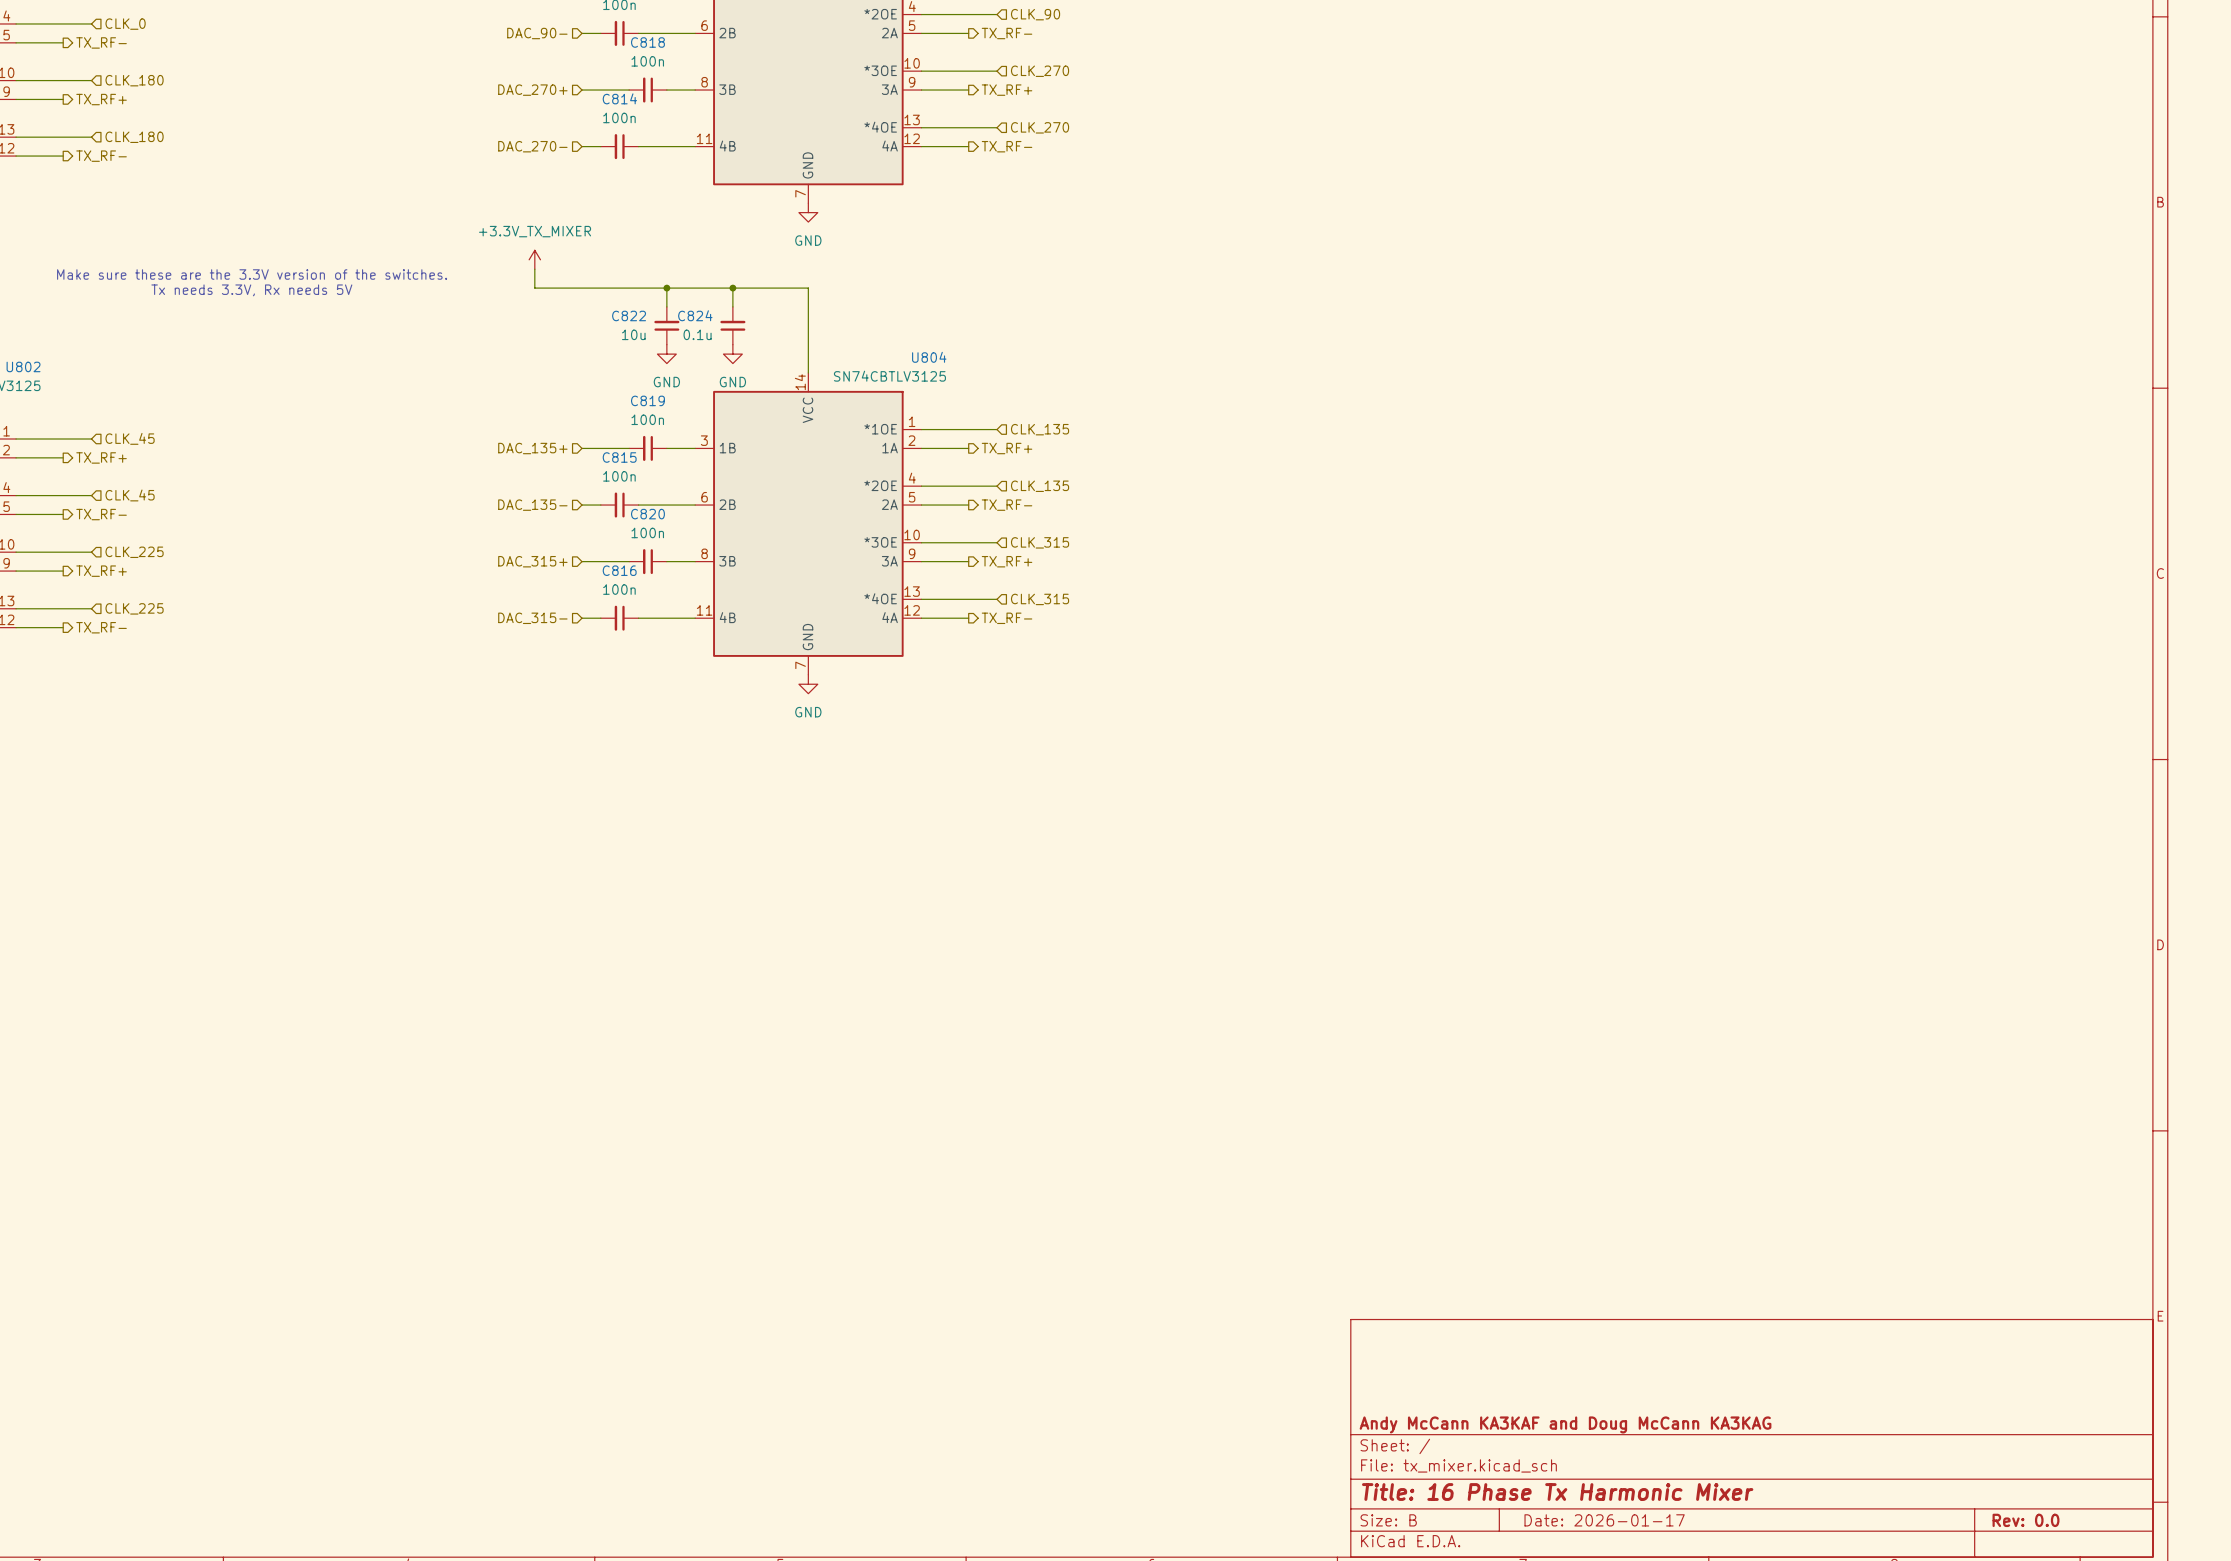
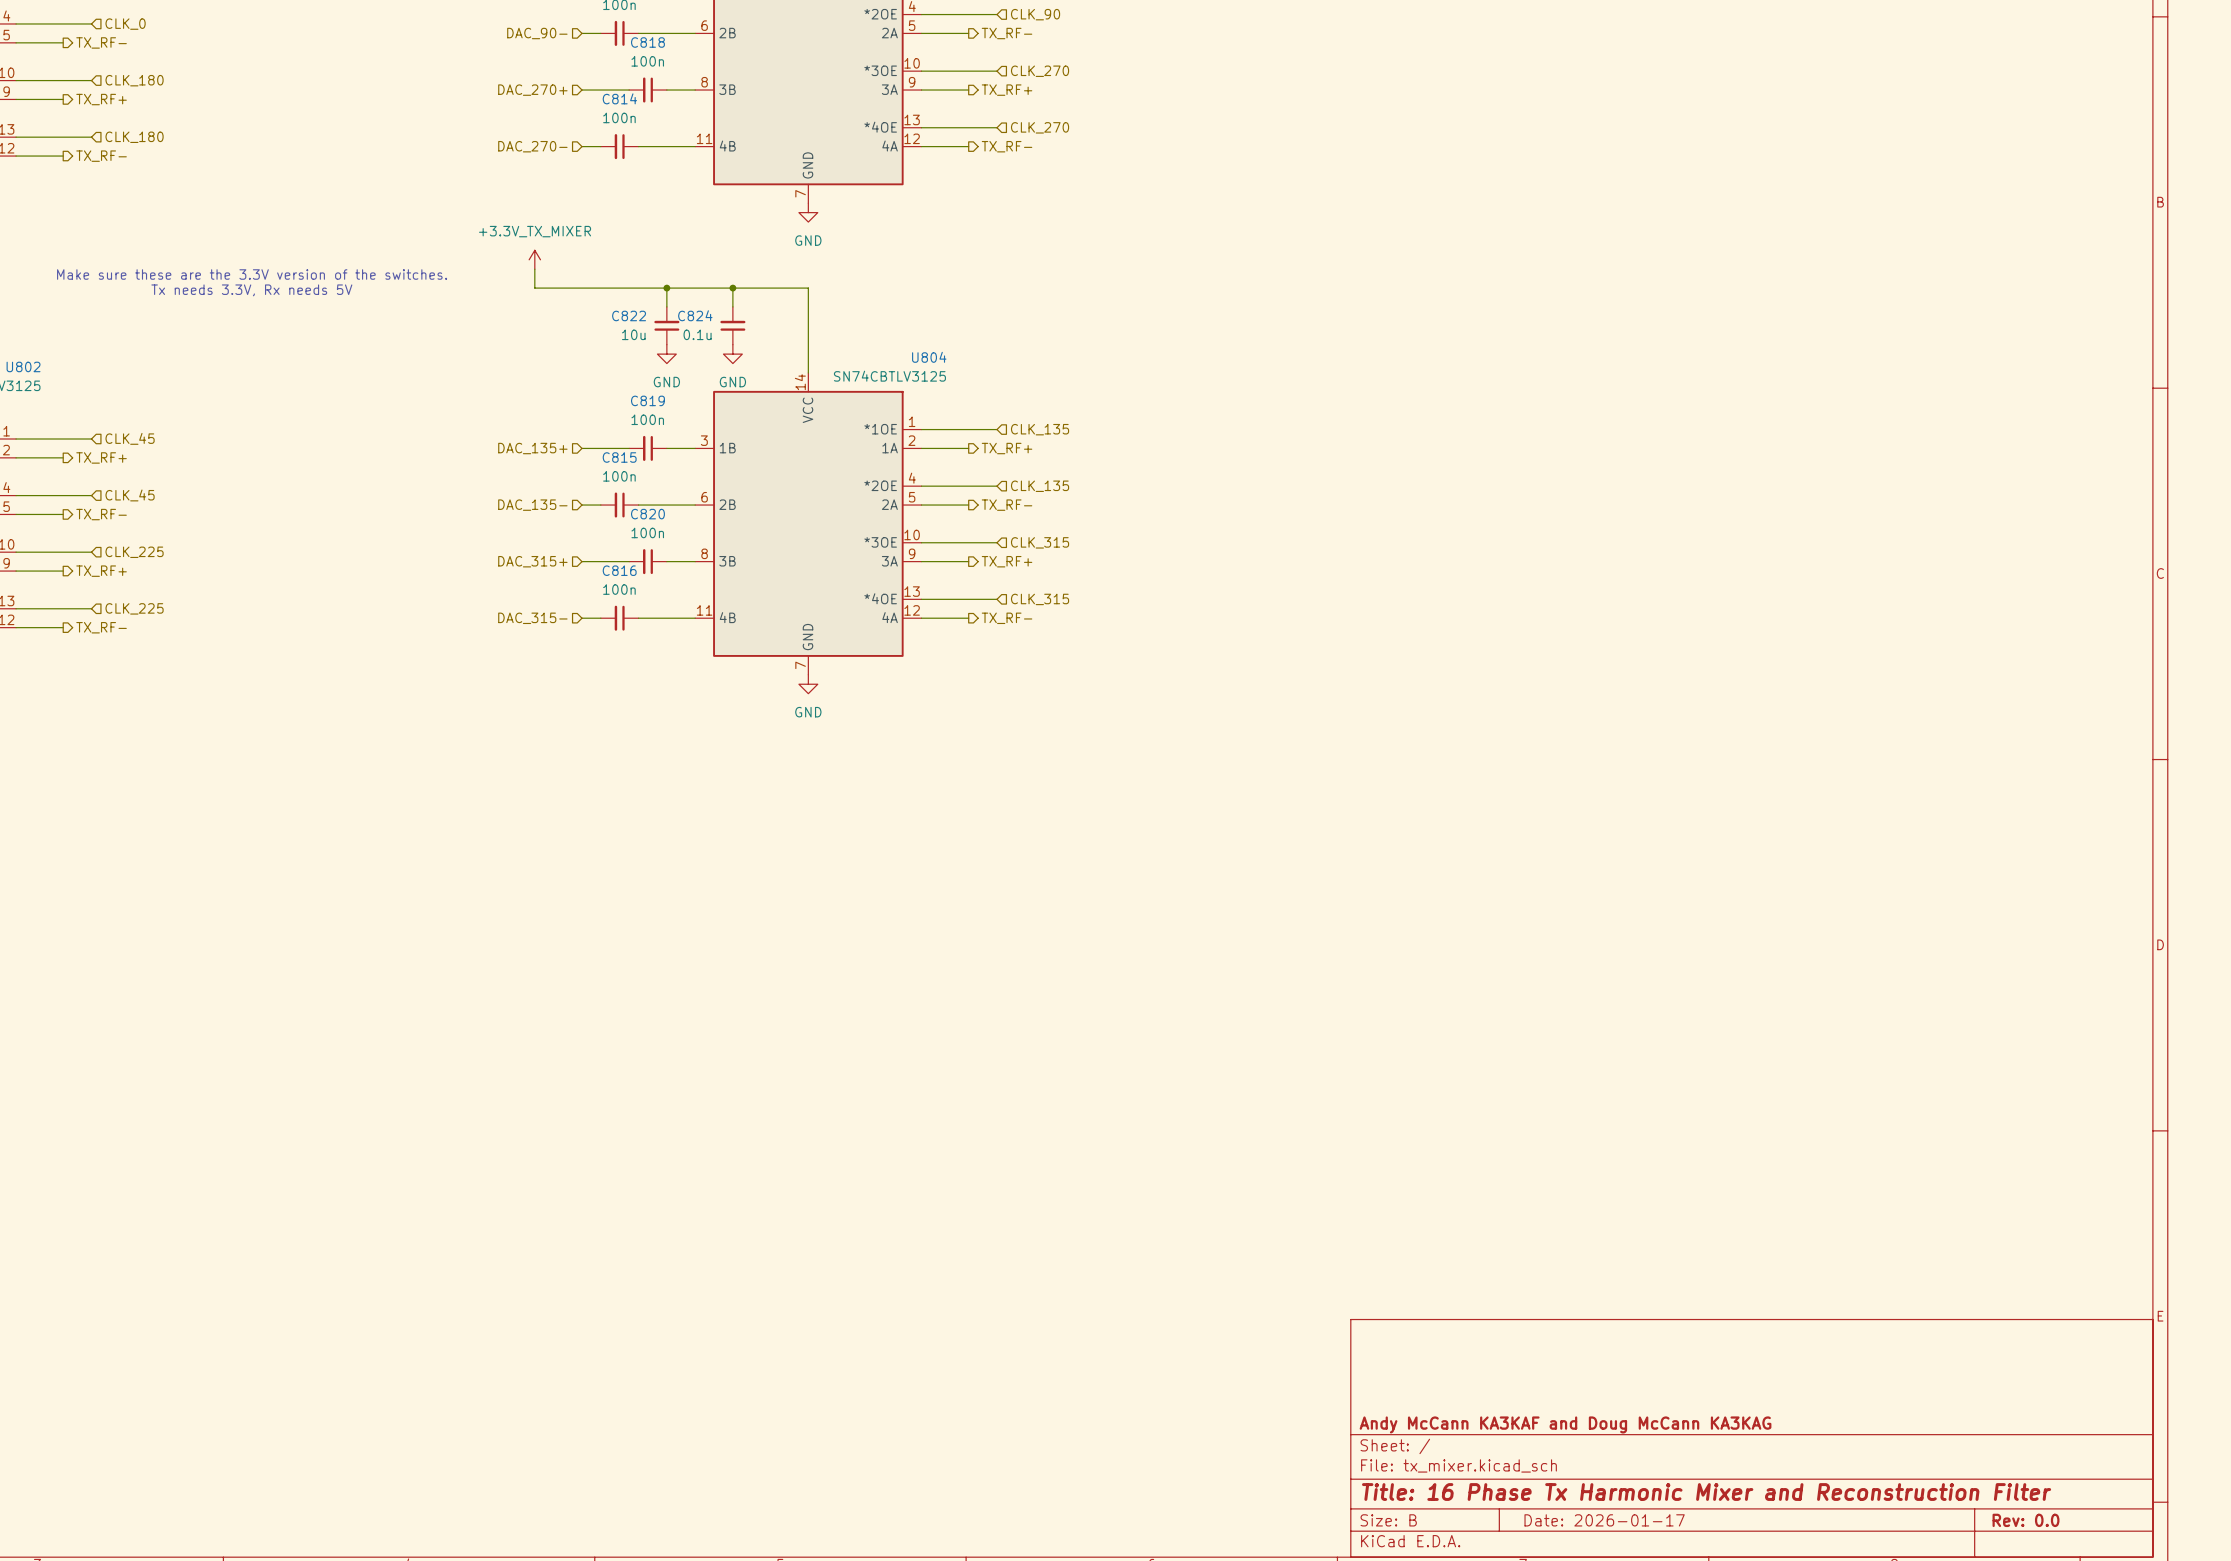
title block: Title: 16 Phase Tx Harmonic Mixer (1557, 1492) -> Title: 16 Phase Tx Harmonic Mixer and Reconstruction Filter (1706, 1492)

